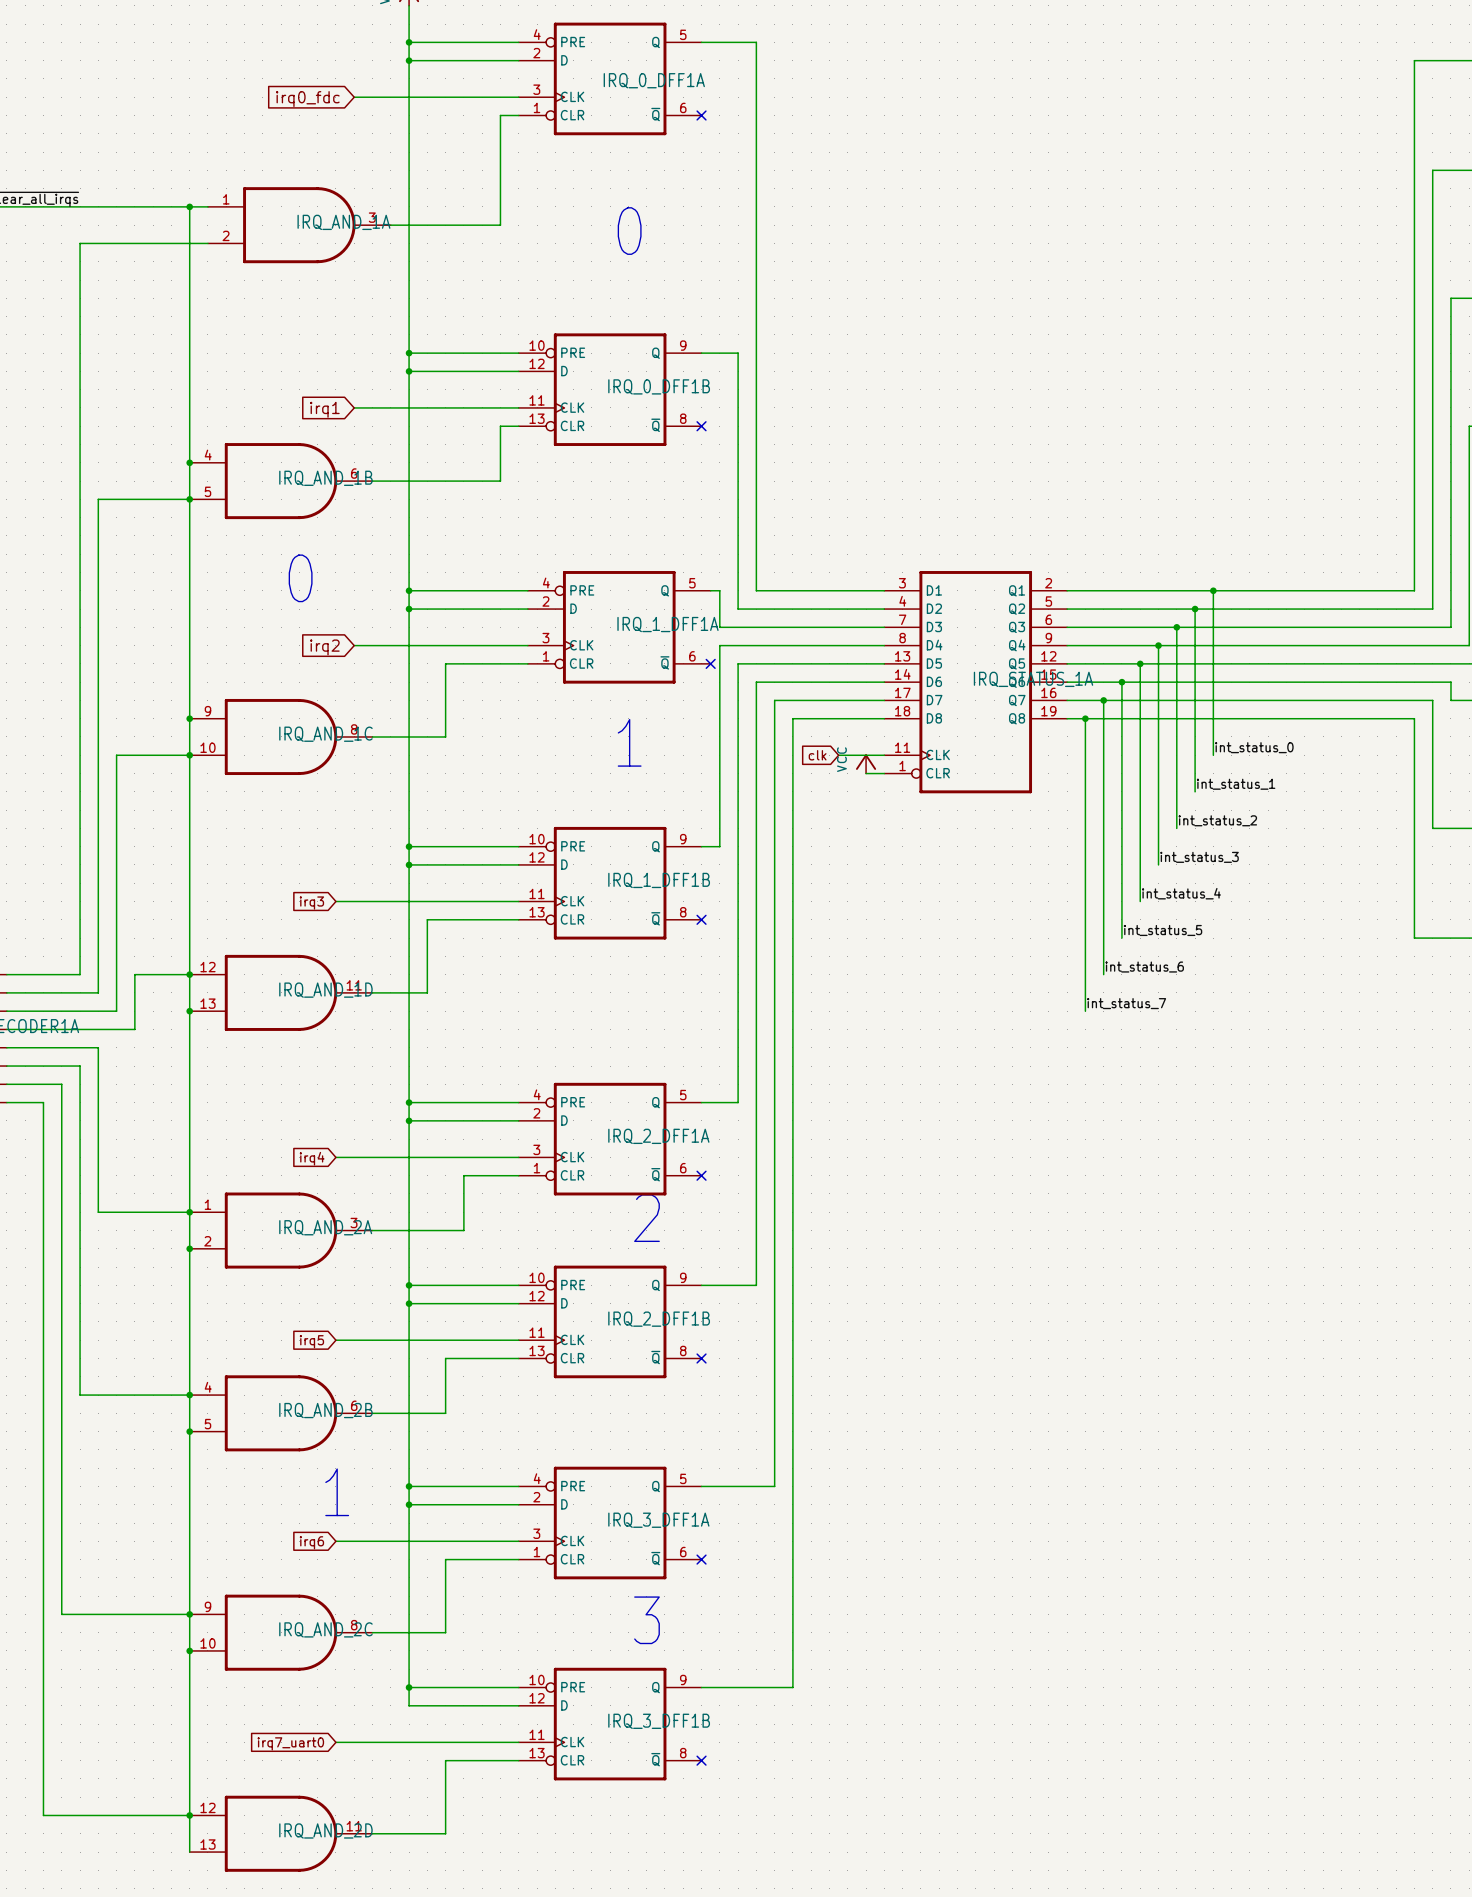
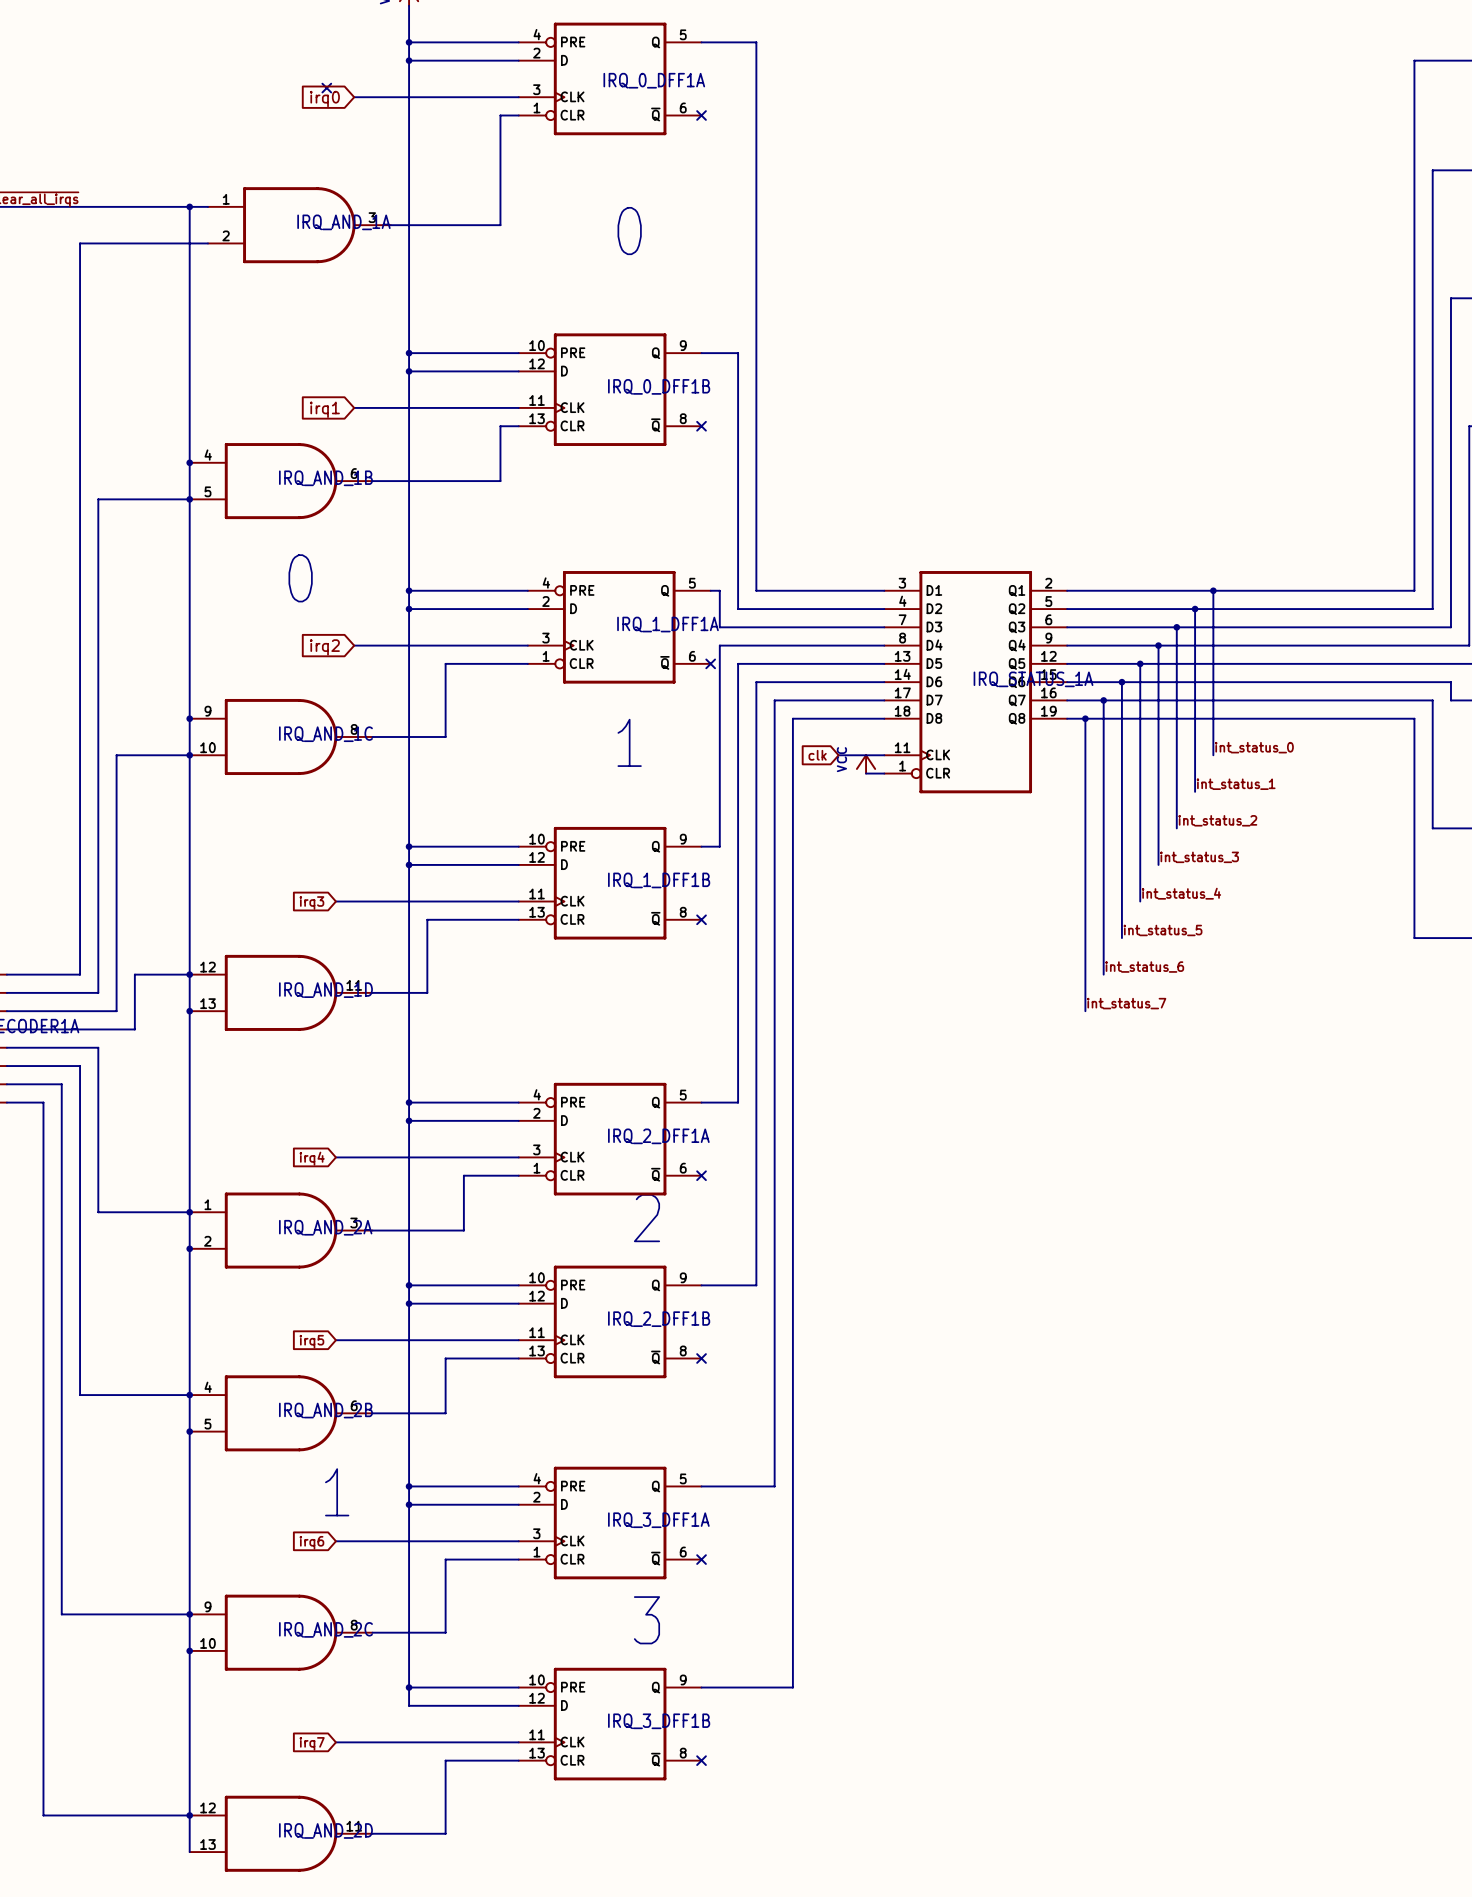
no-connect mark: none -> (326, 88)
global label: irq0_fdc (307, 99) -> irq0 (324, 99)
global label: irq7_uart0 (290, 1743) -> irq7 (312, 1743)

